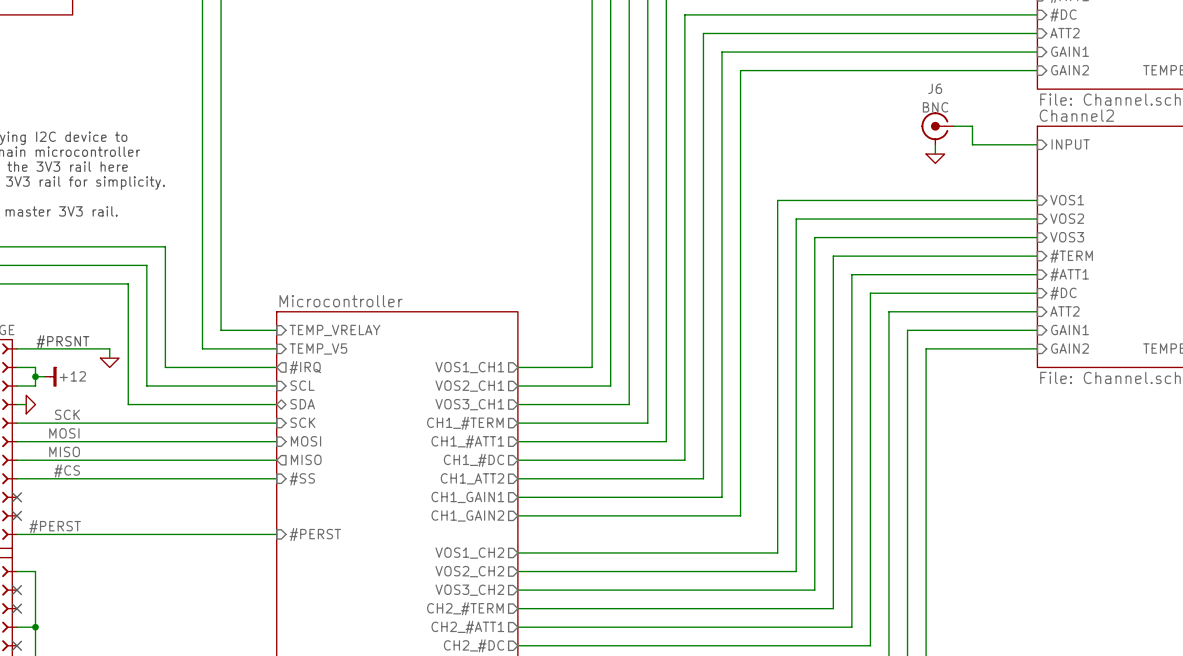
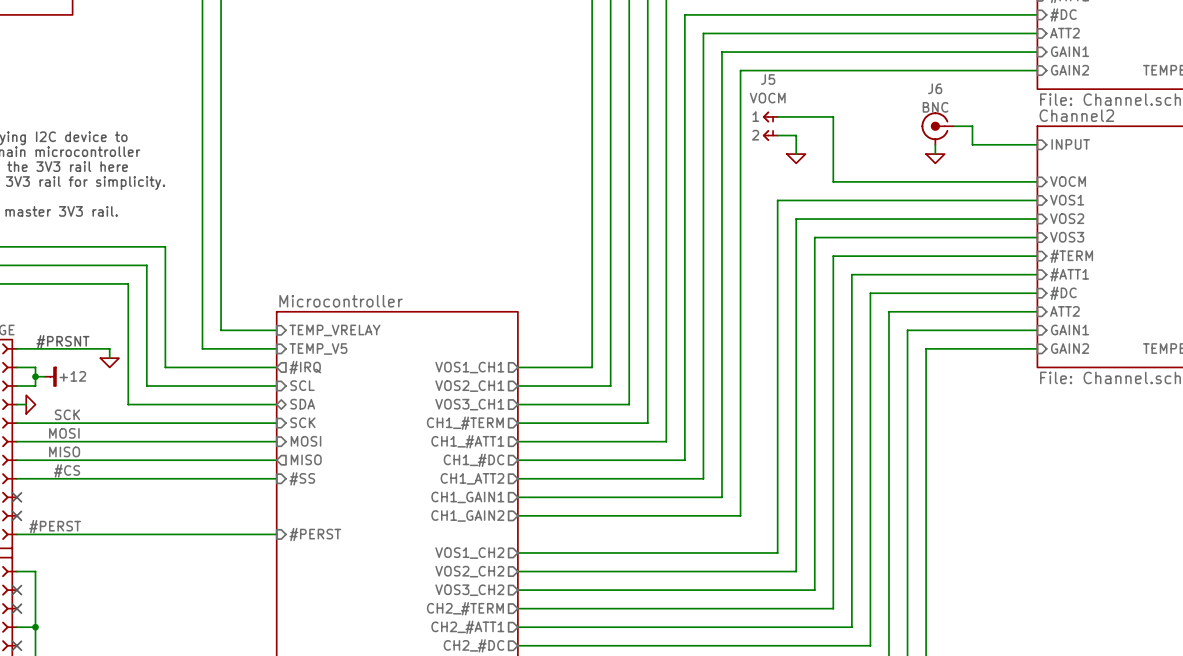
wire: none -> (777, 116) (833, 116) (833, 181) (1037, 181)
J5: none -> VOCM (770, 126)
wire: none -> (777, 135) (796, 135) (796, 154)
power symbol: none -> (796, 158)
sheet pin: none -> VOCM (1068, 181)

